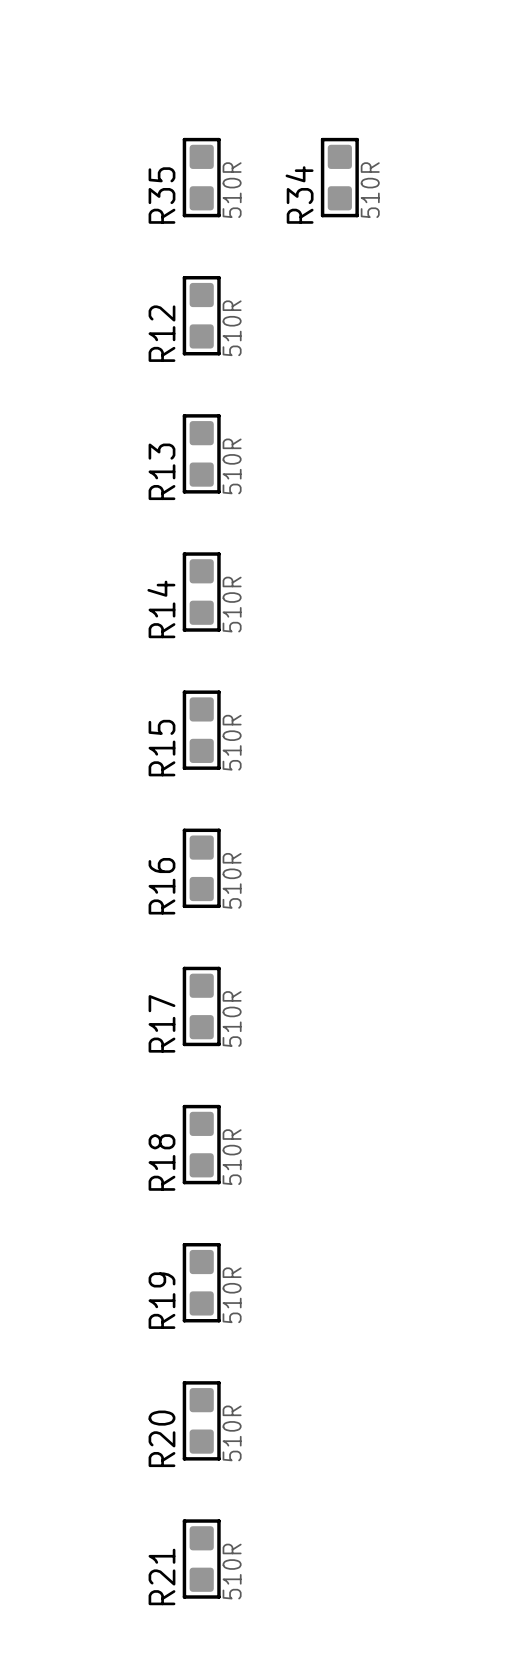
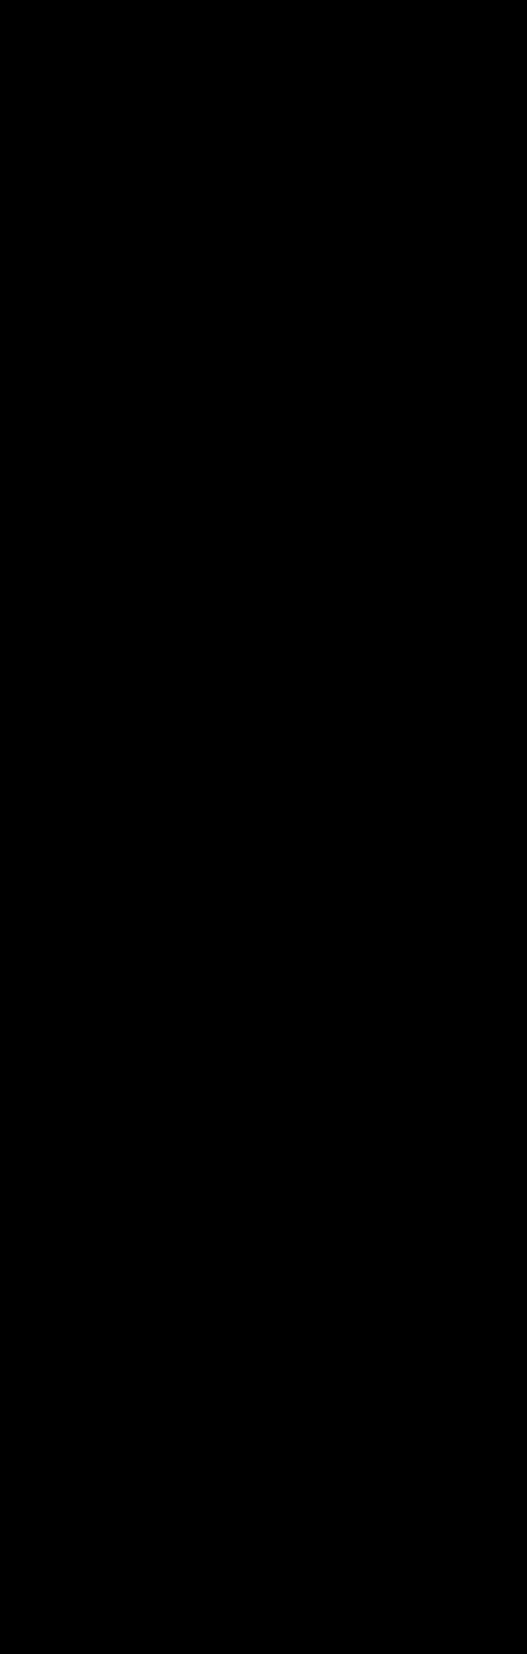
R35: 510R (201, 177) -> none
R34: 510R (339, 177) -> none
R12: 510R (201, 315) -> none
R13: 510R (201, 453) -> none
R14: 510R (201, 592) -> none
R15: 510R (201, 730) -> none
R16: 510R (201, 868) -> none
R17: 510R (201, 1006) -> none
R18: 510R (201, 1144) -> none
R19: 510R (201, 1282) -> none
R20: 510R (201, 1420) -> none
R21: 510R (201, 1559) -> none

